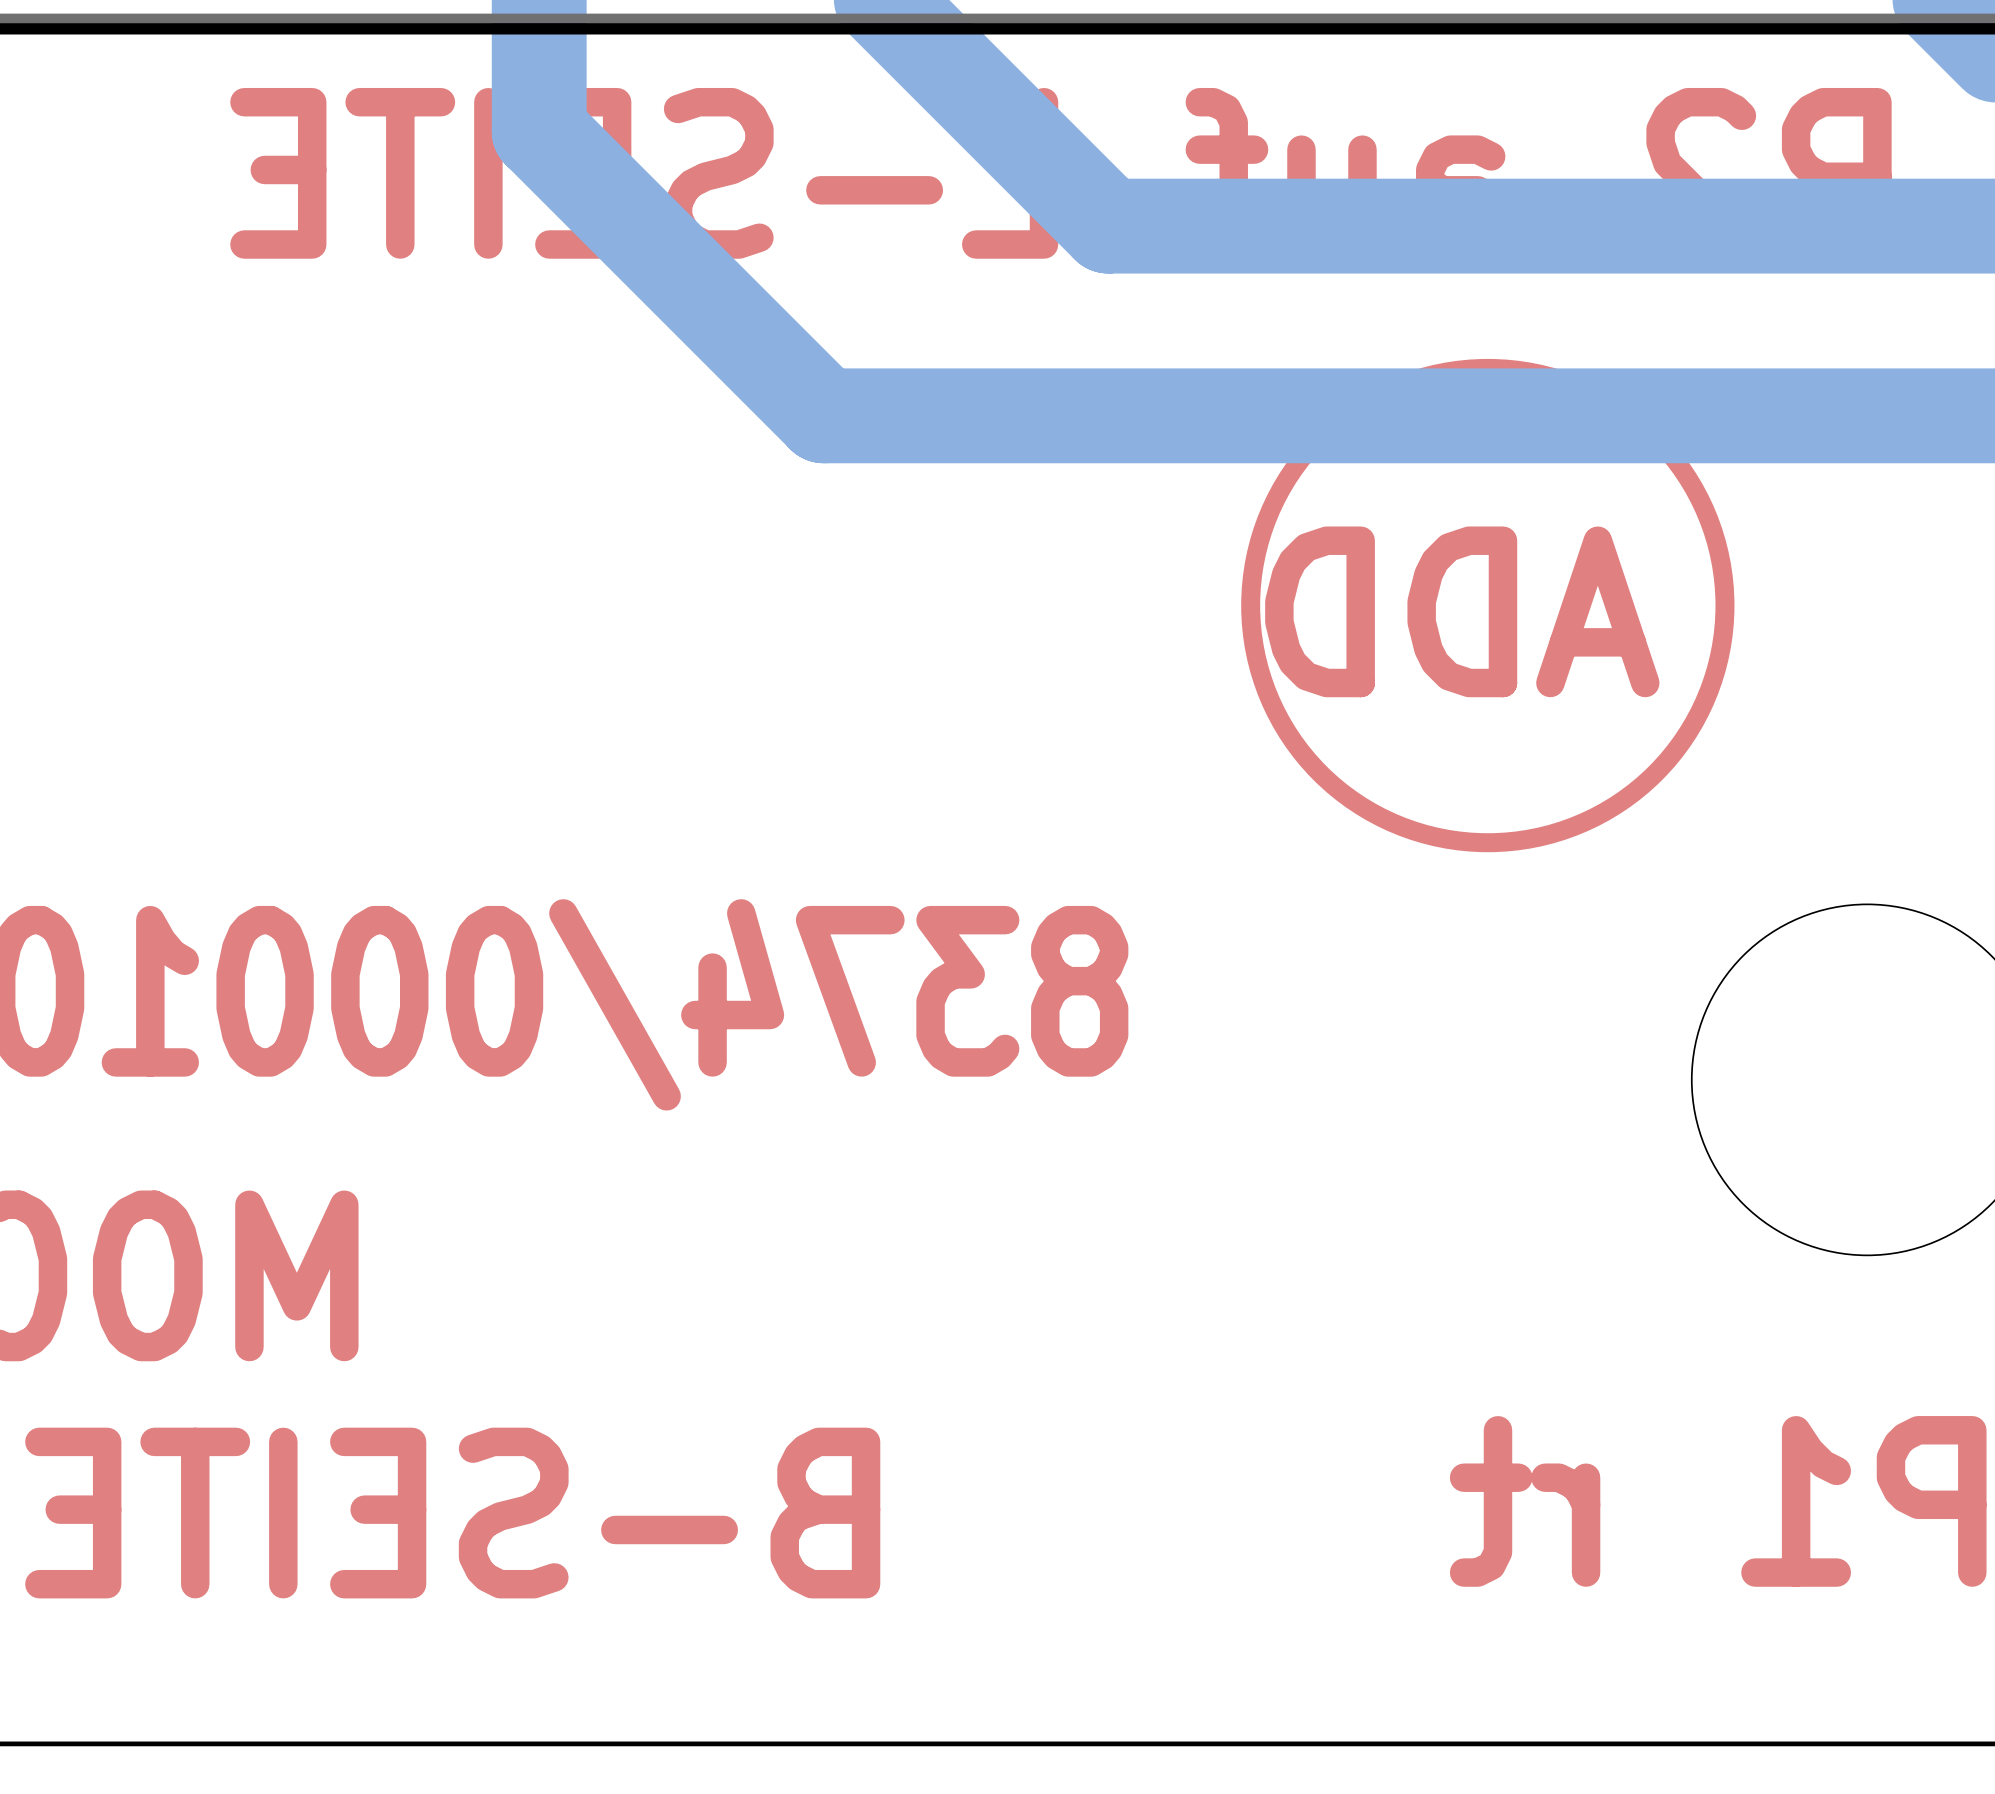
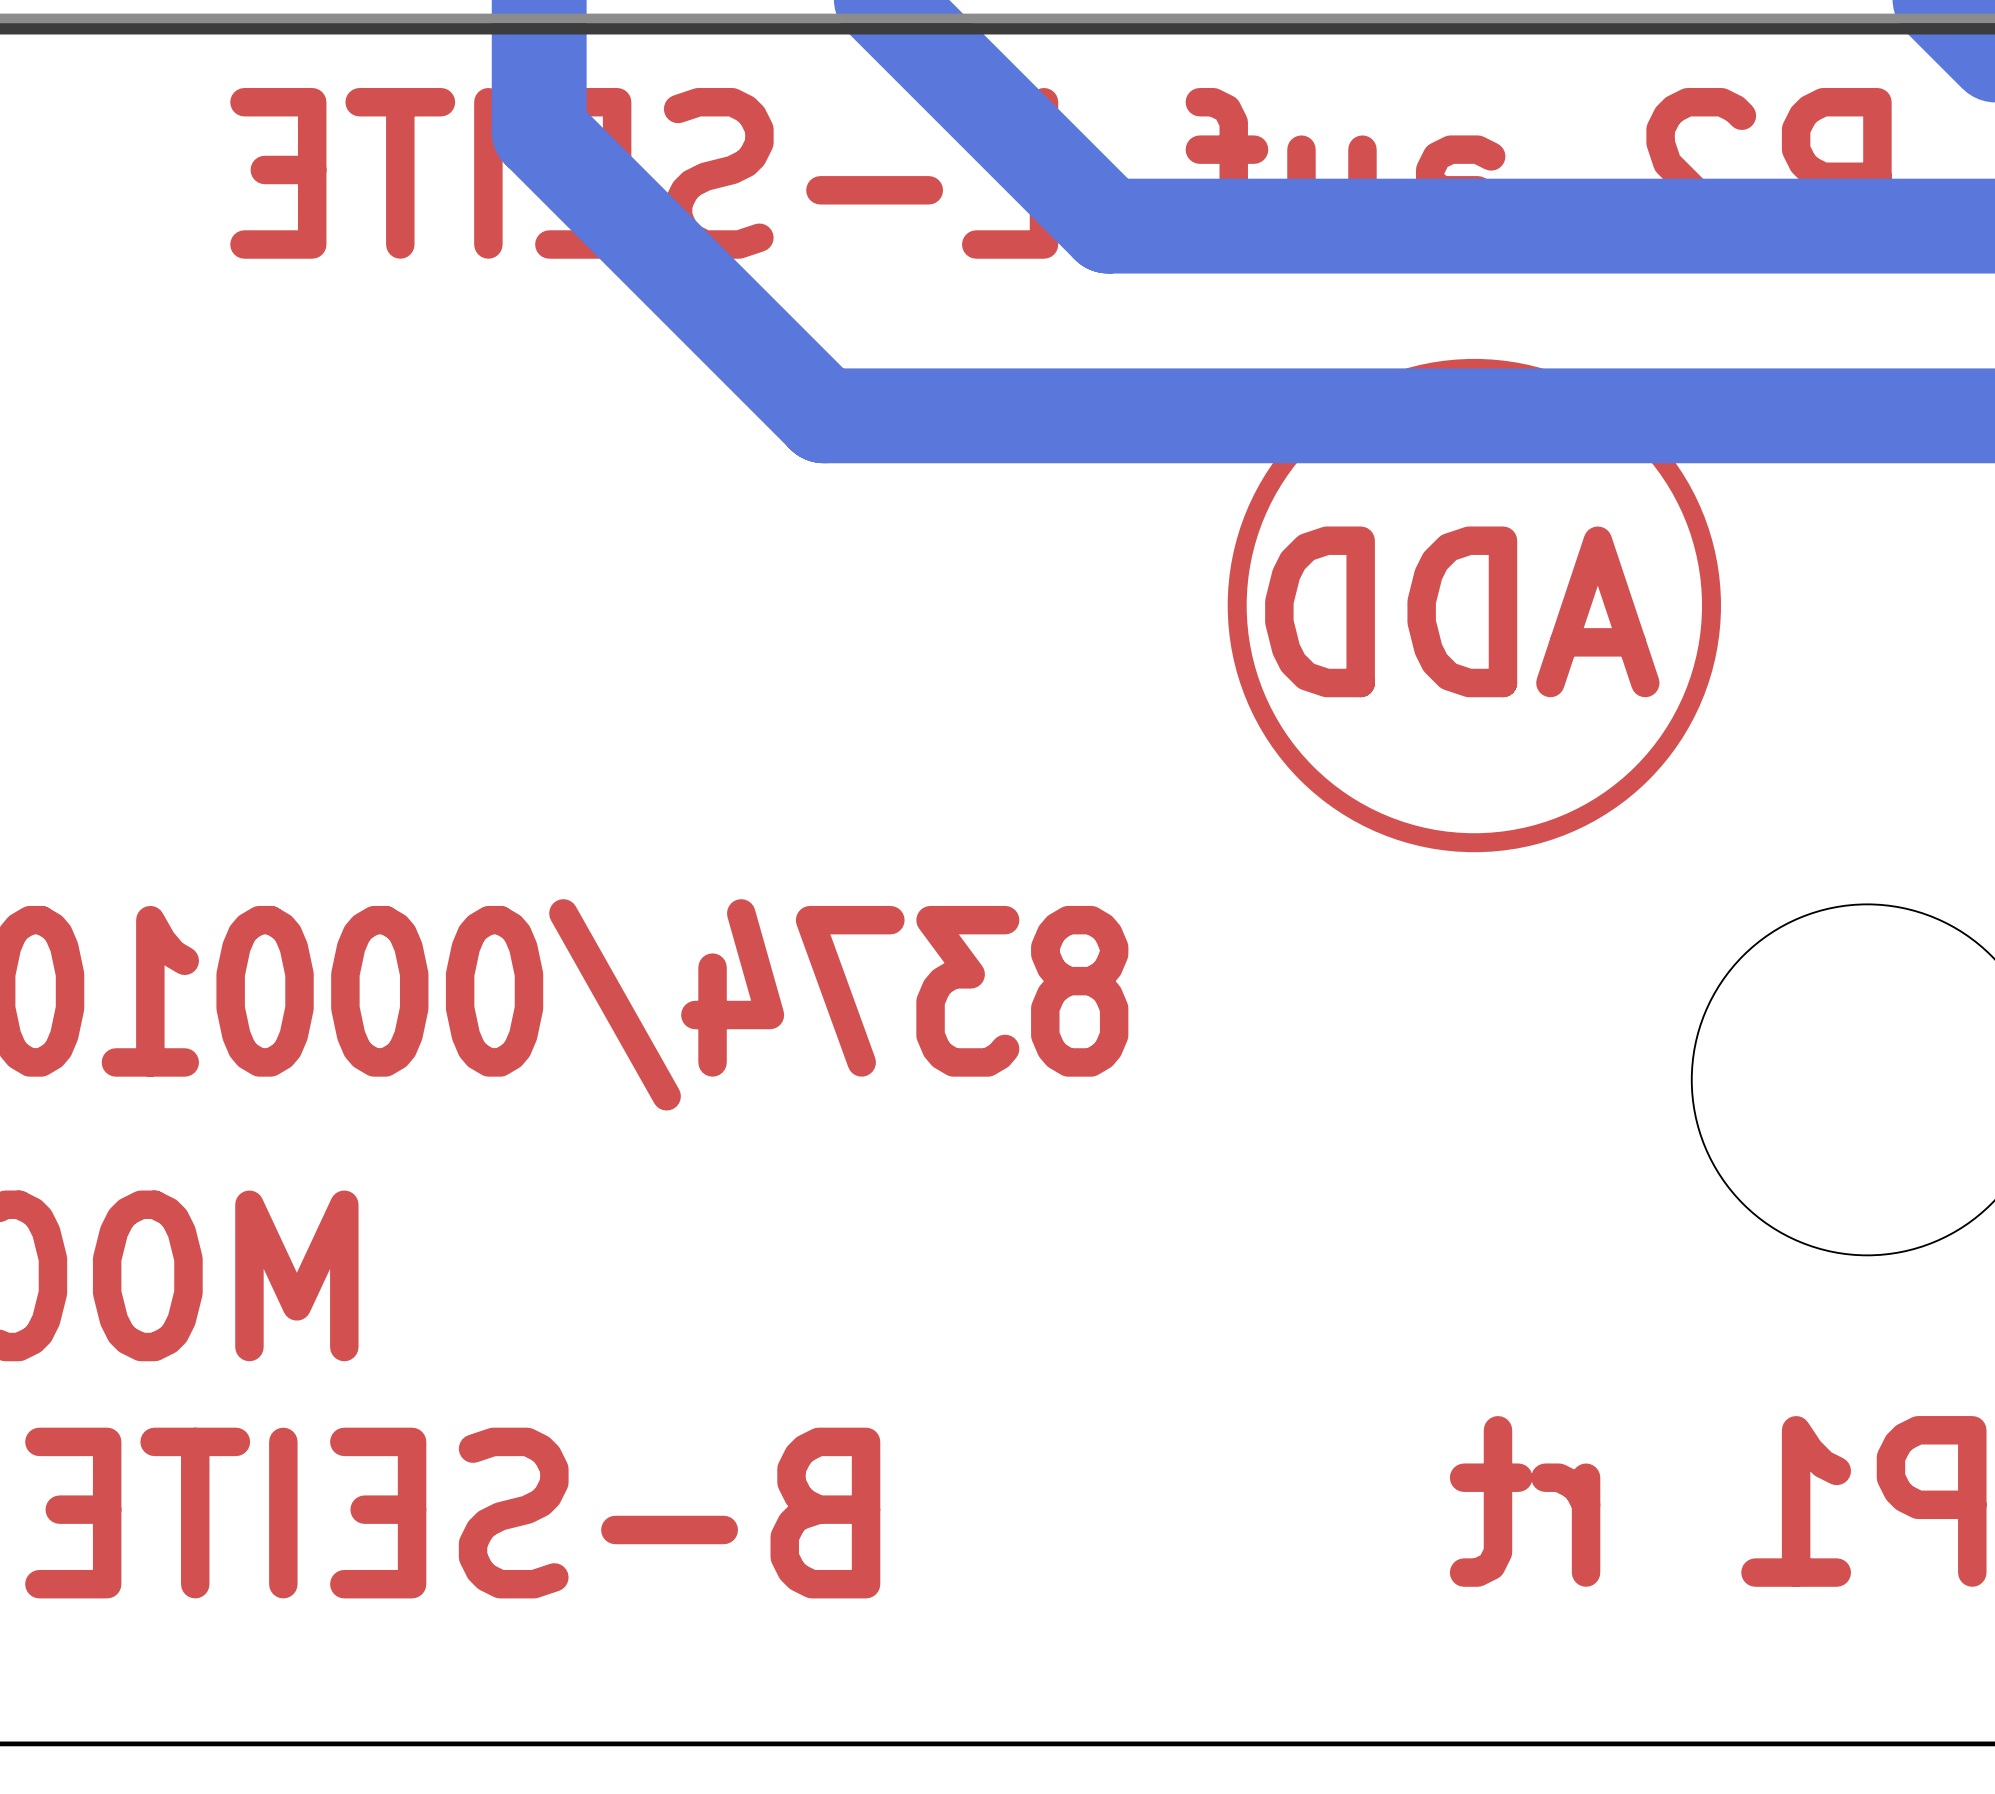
drawing position: (1487, 605) -> (1474, 605)

